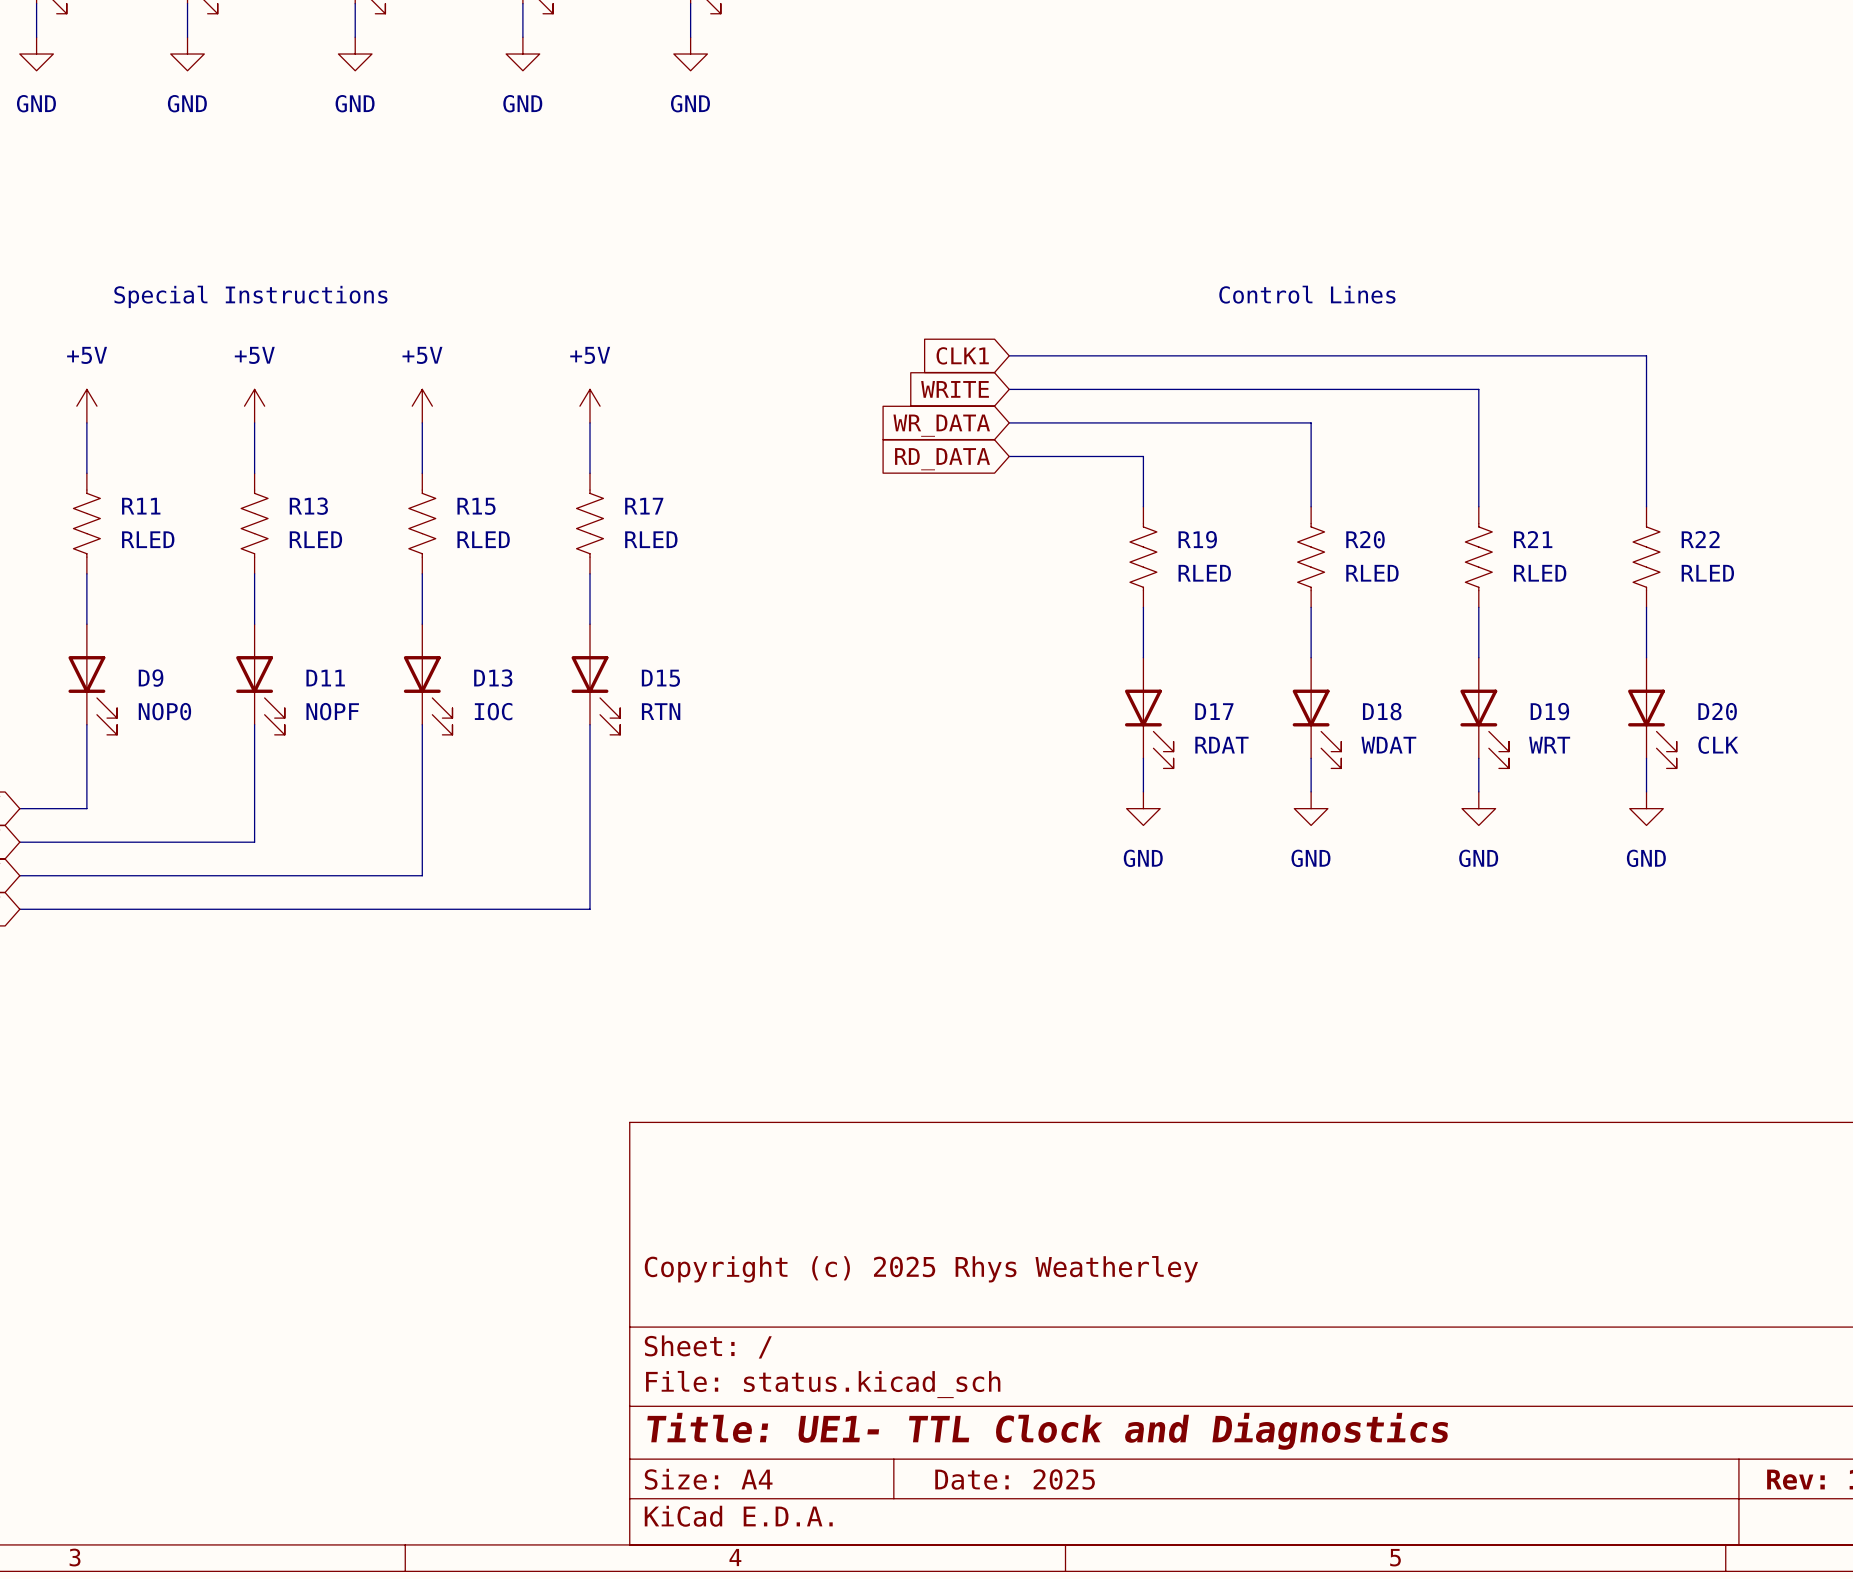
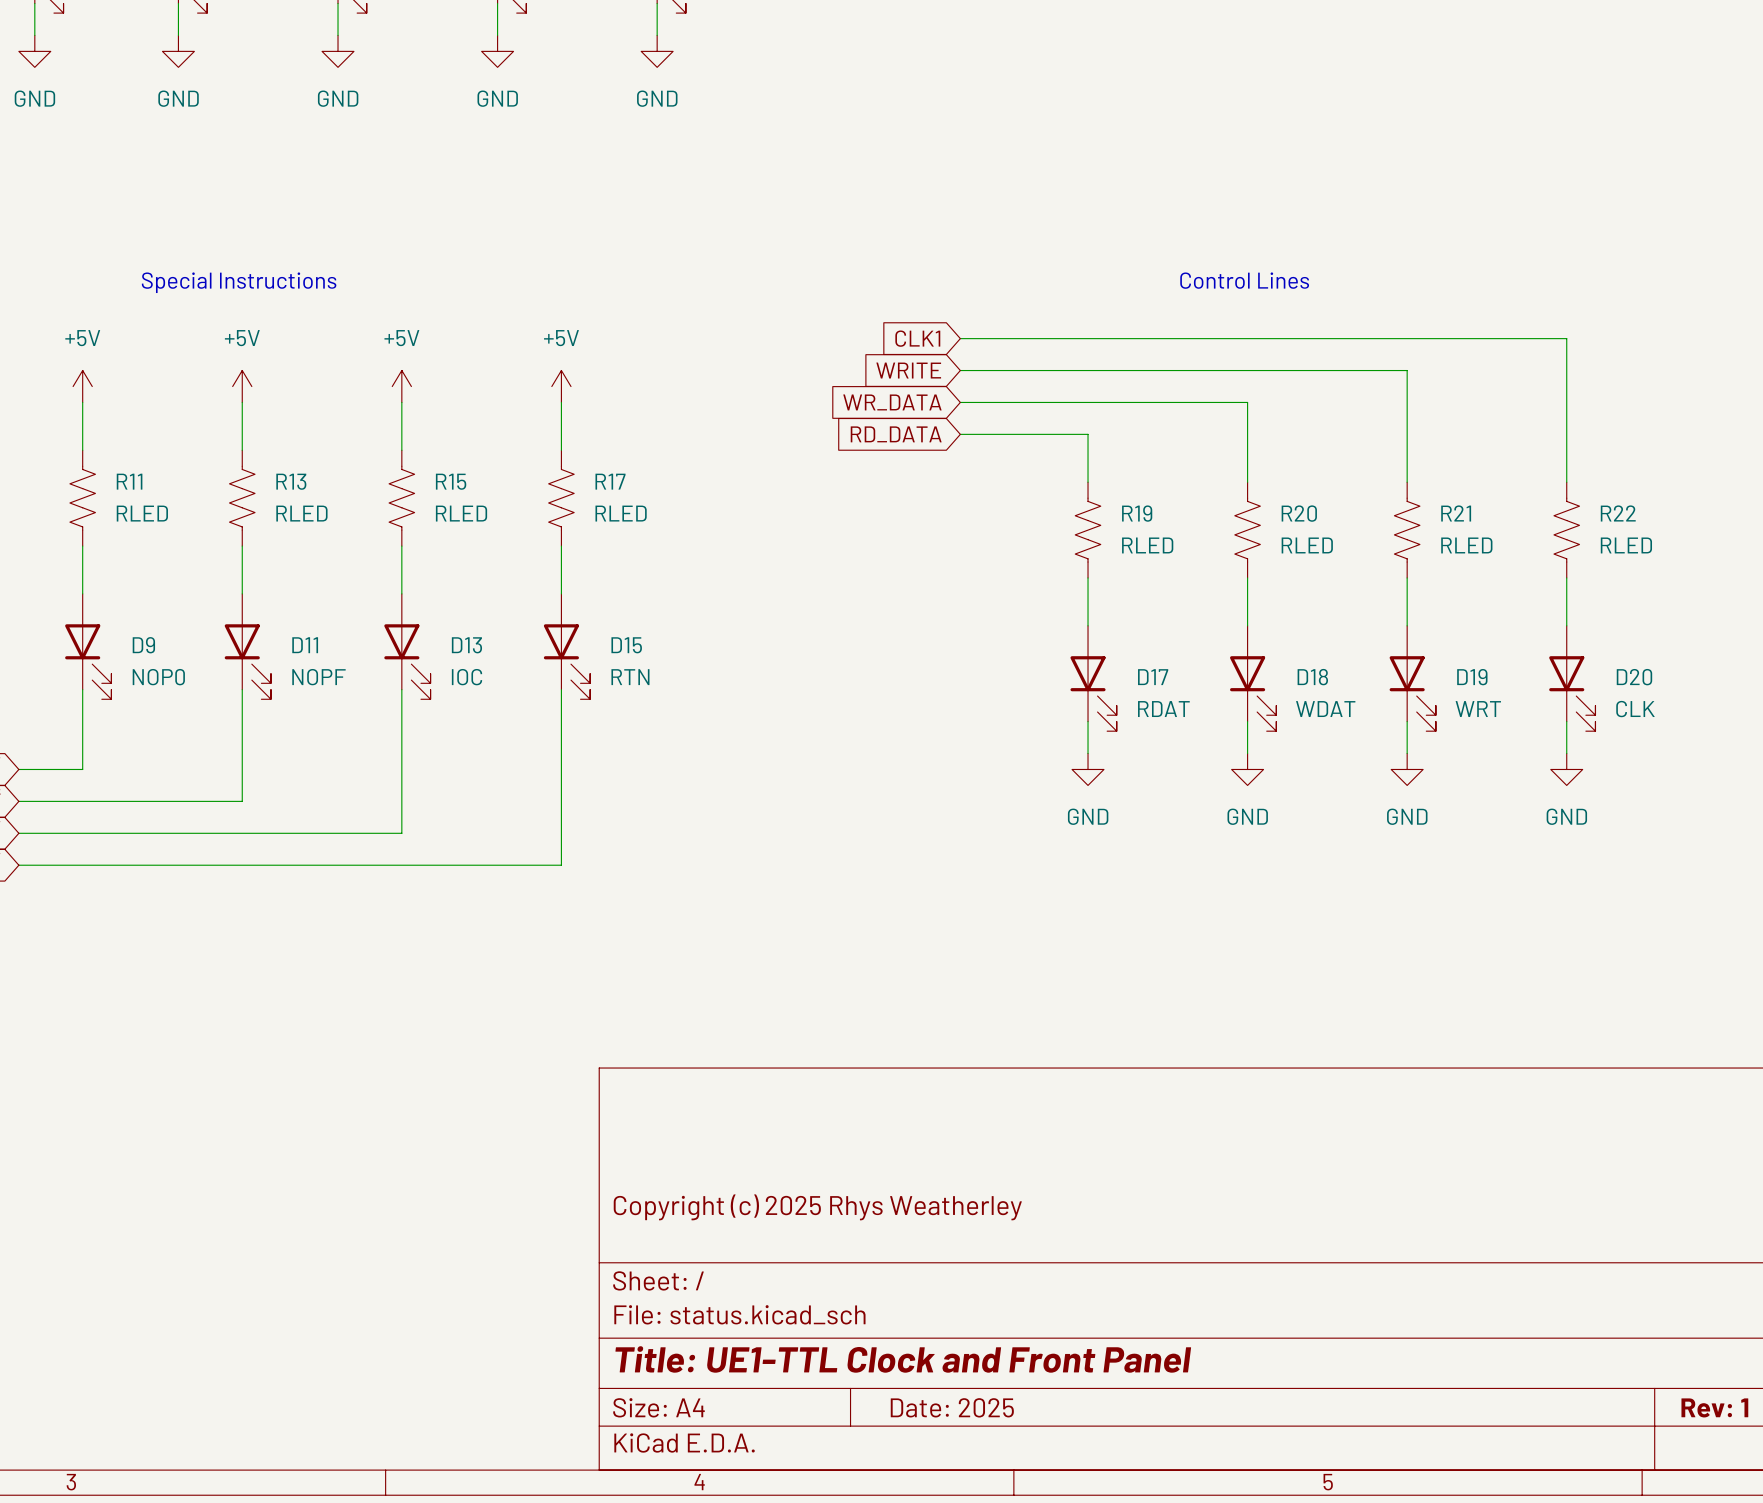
title block: Title: UE1- TTL Clock and Diagnostics (1047, 1431) -> Title: UE1-TTL Clock and Front Panel (903, 1359)

